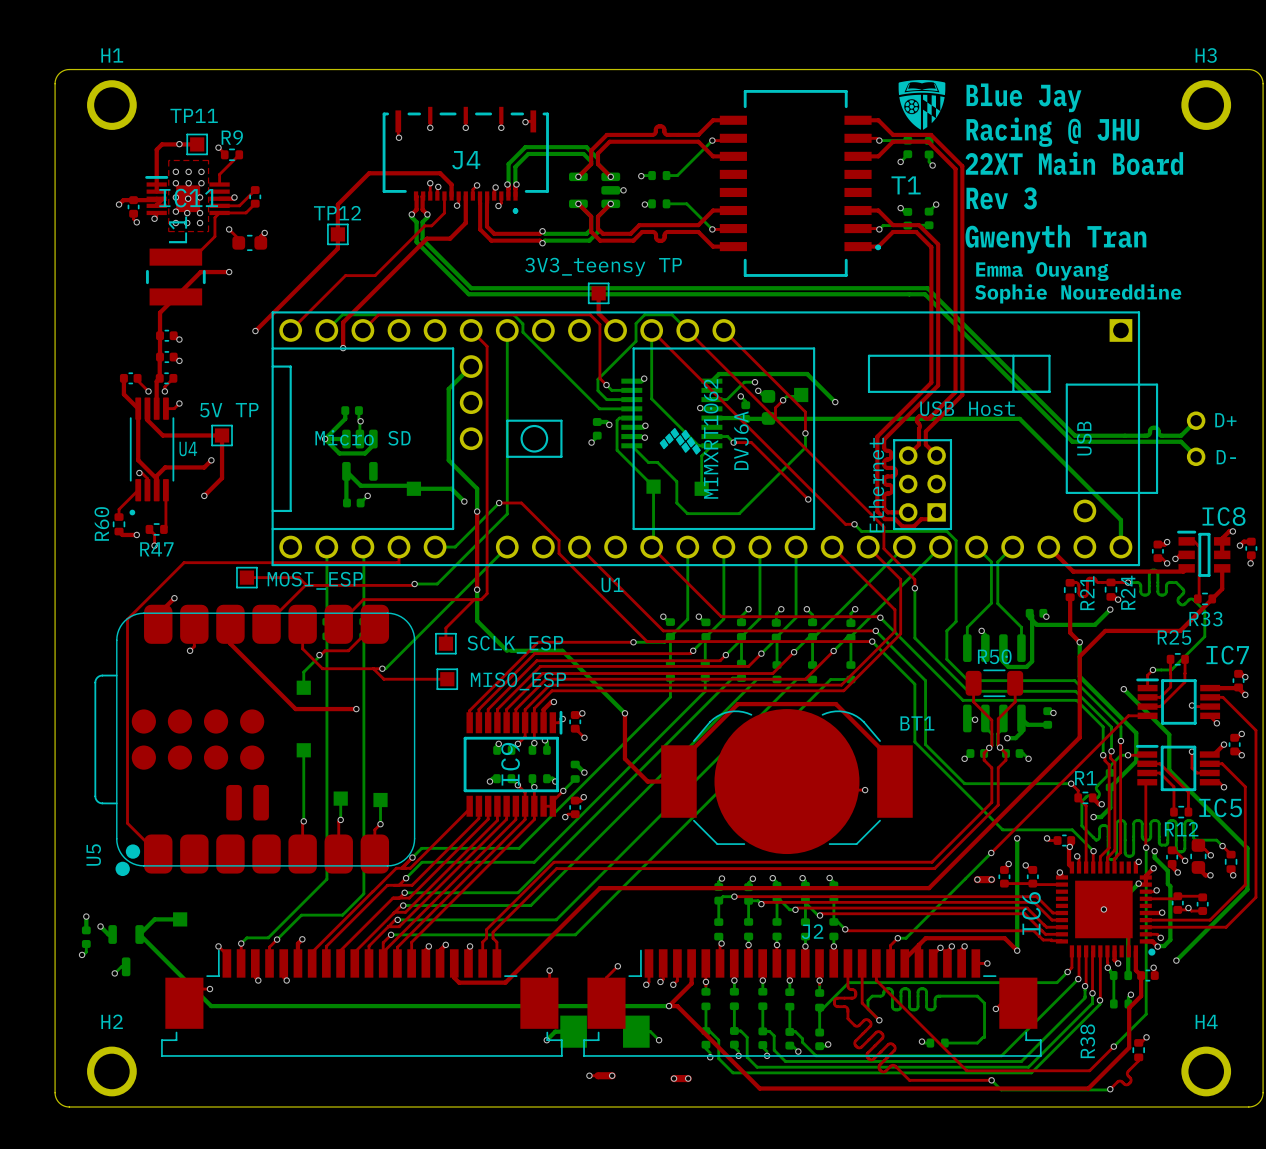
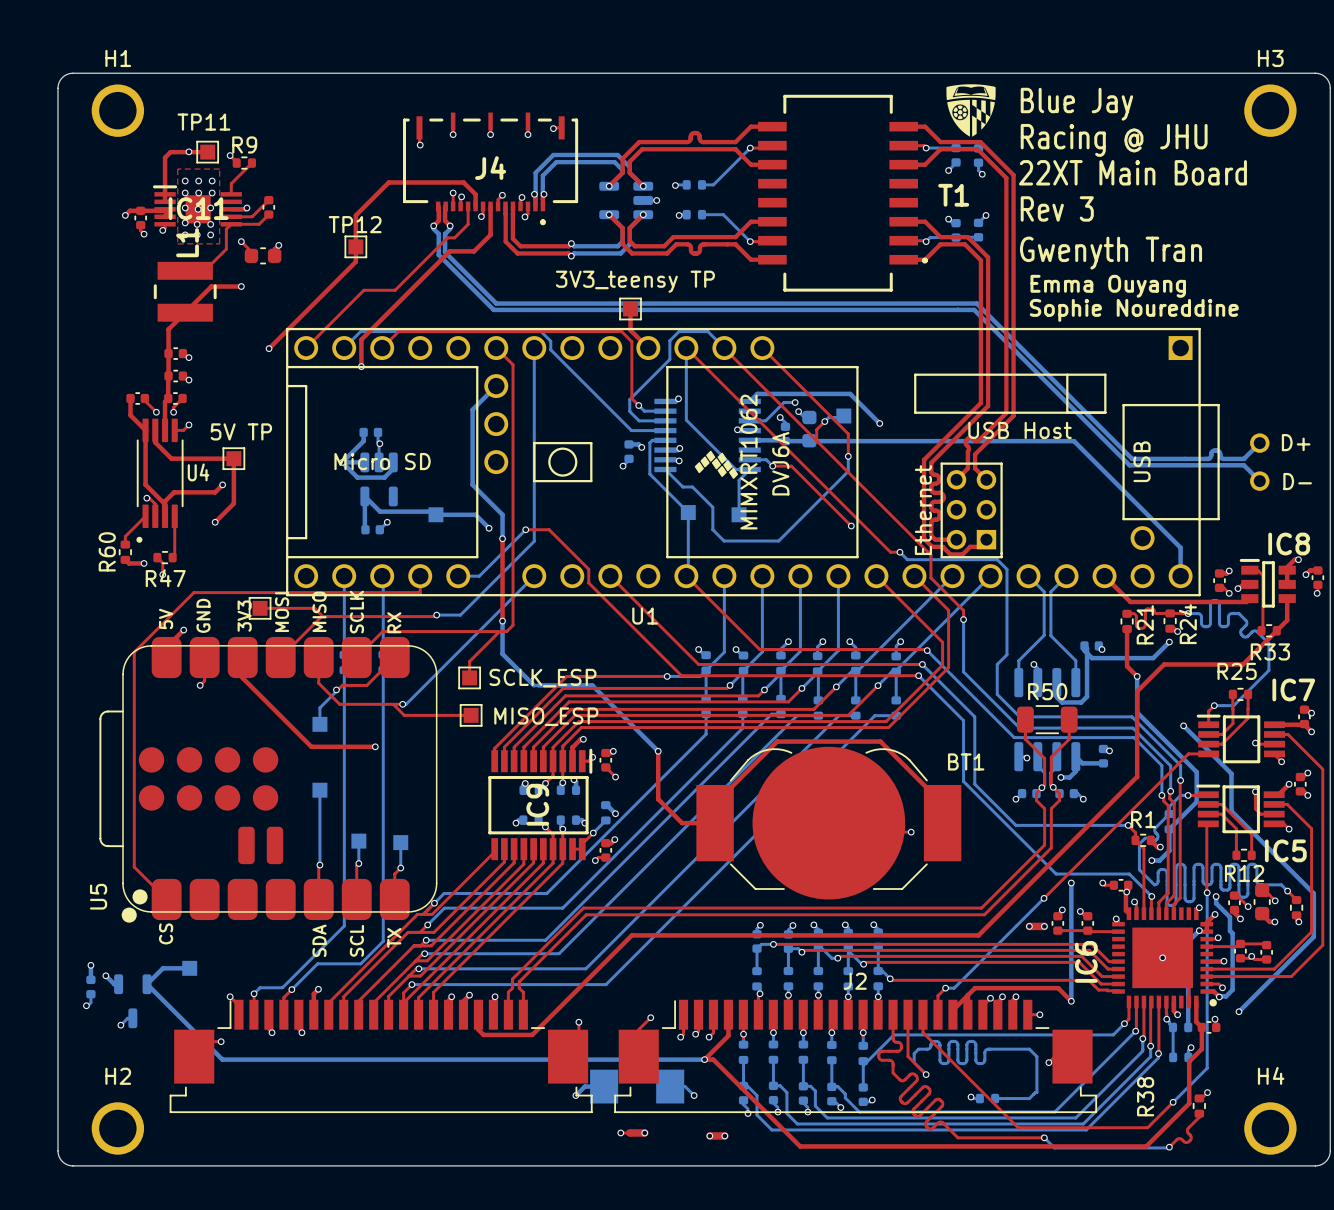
part value: MOSI_ESP (315, 580) -> MOSI (282, 612)
text: none -> SCLK (356, 612)
text: none -> MISO (319, 611)
text: none -> GND (203, 615)
text: none -> 3V3 (244, 616)
text: none -> 5V (166, 619)
text: none -> RX (394, 622)
text: none -> CS (166, 933)
text: none -> TX (394, 937)
text: none -> SDA (319, 940)
text: none -> SCL (356, 940)

